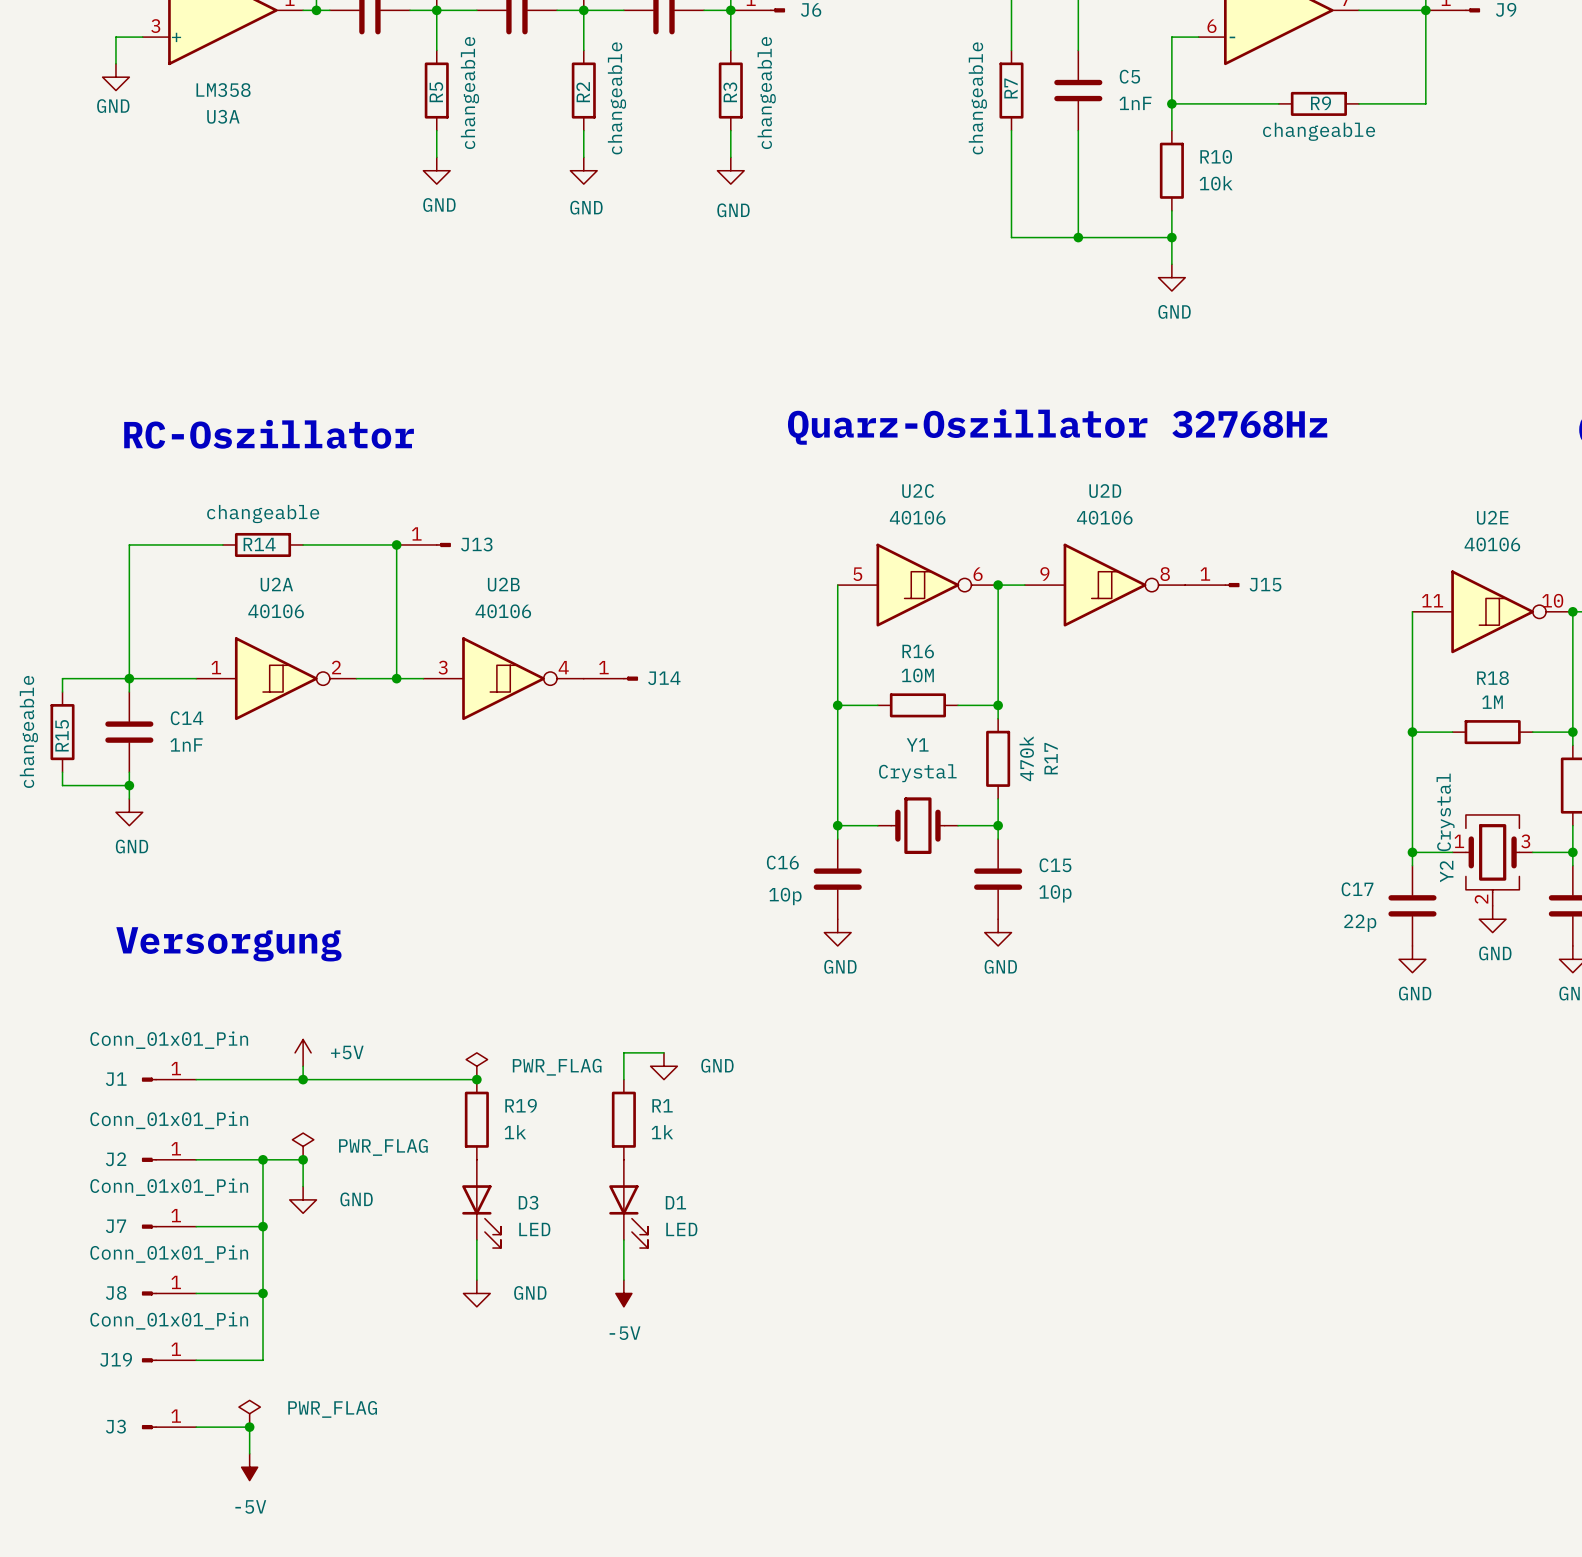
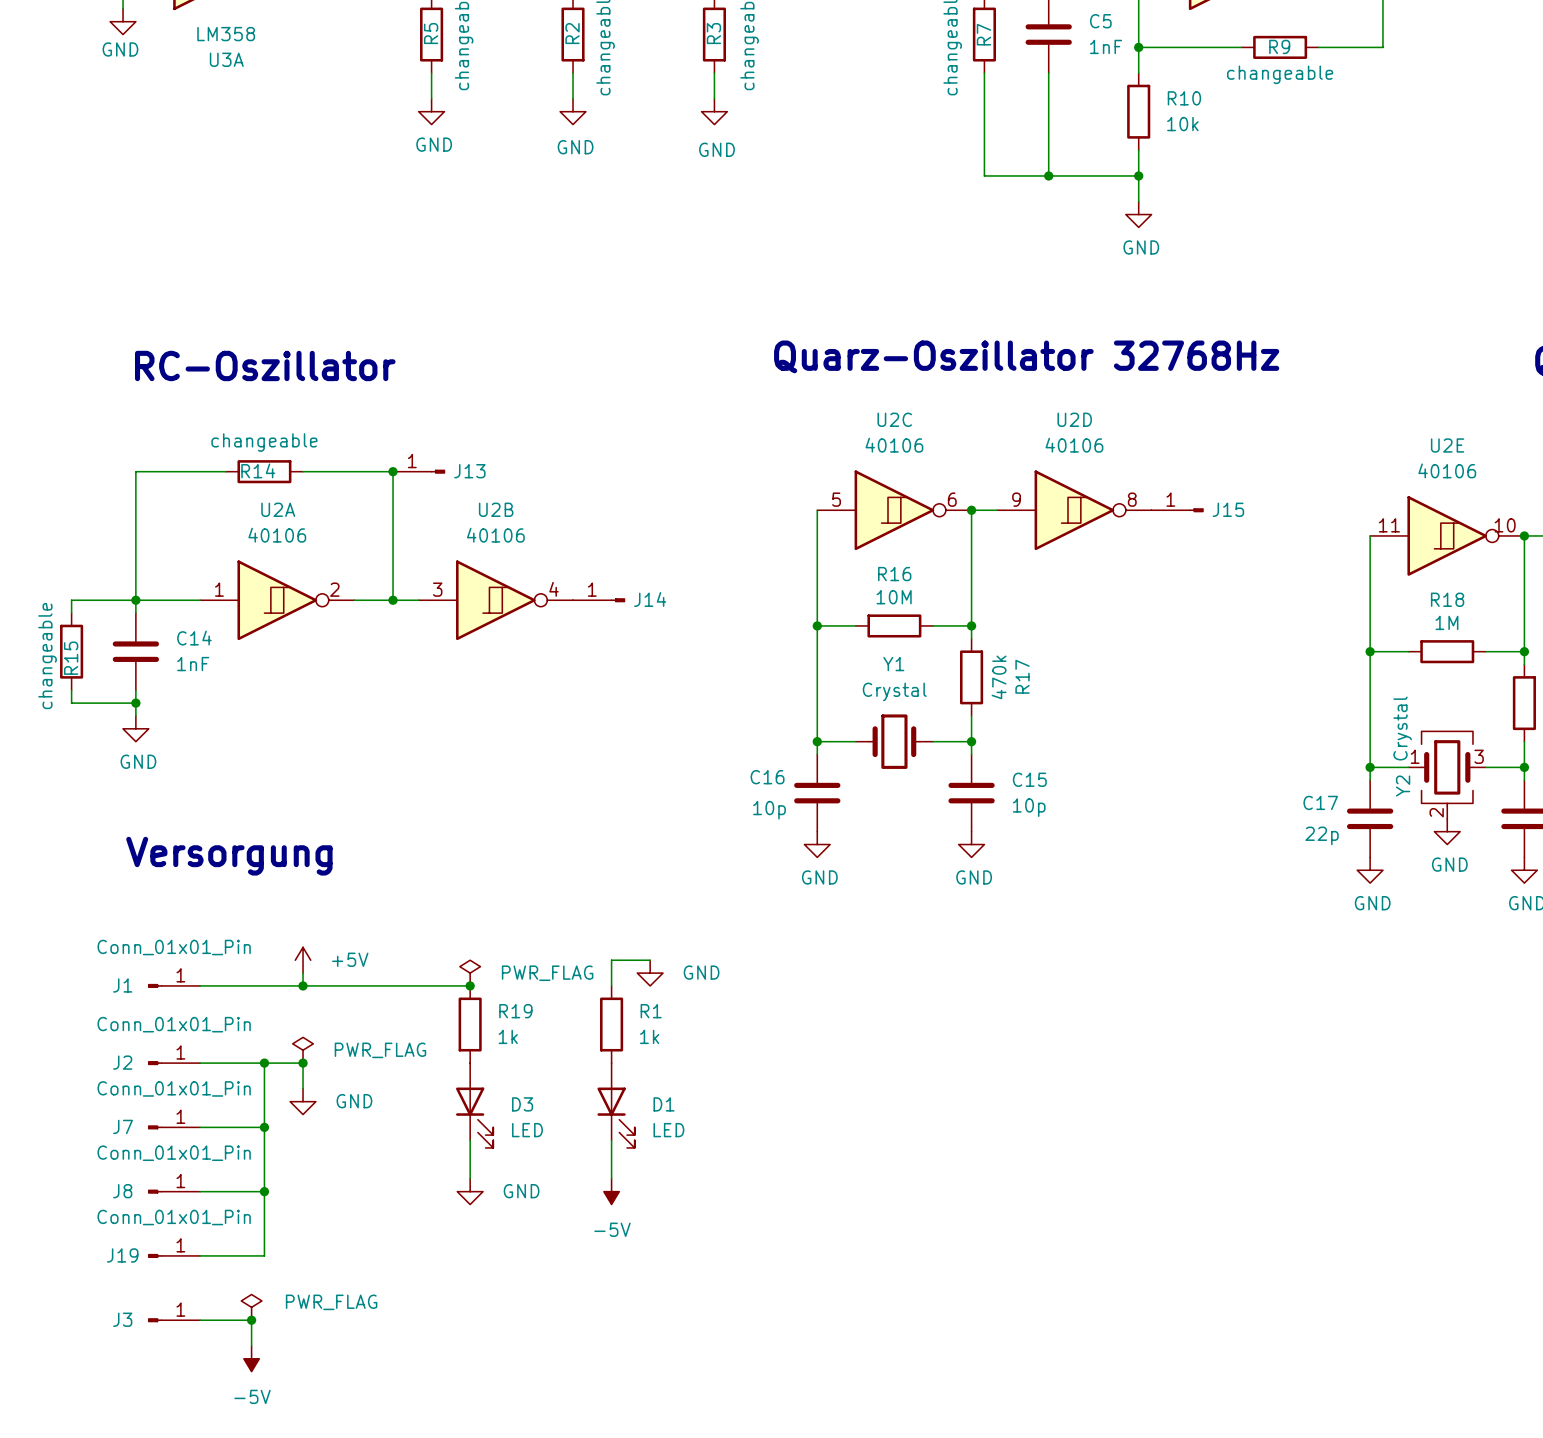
R15 text: changeable (28, 731) -> none
R15 value: none -> changeable (47, 656)

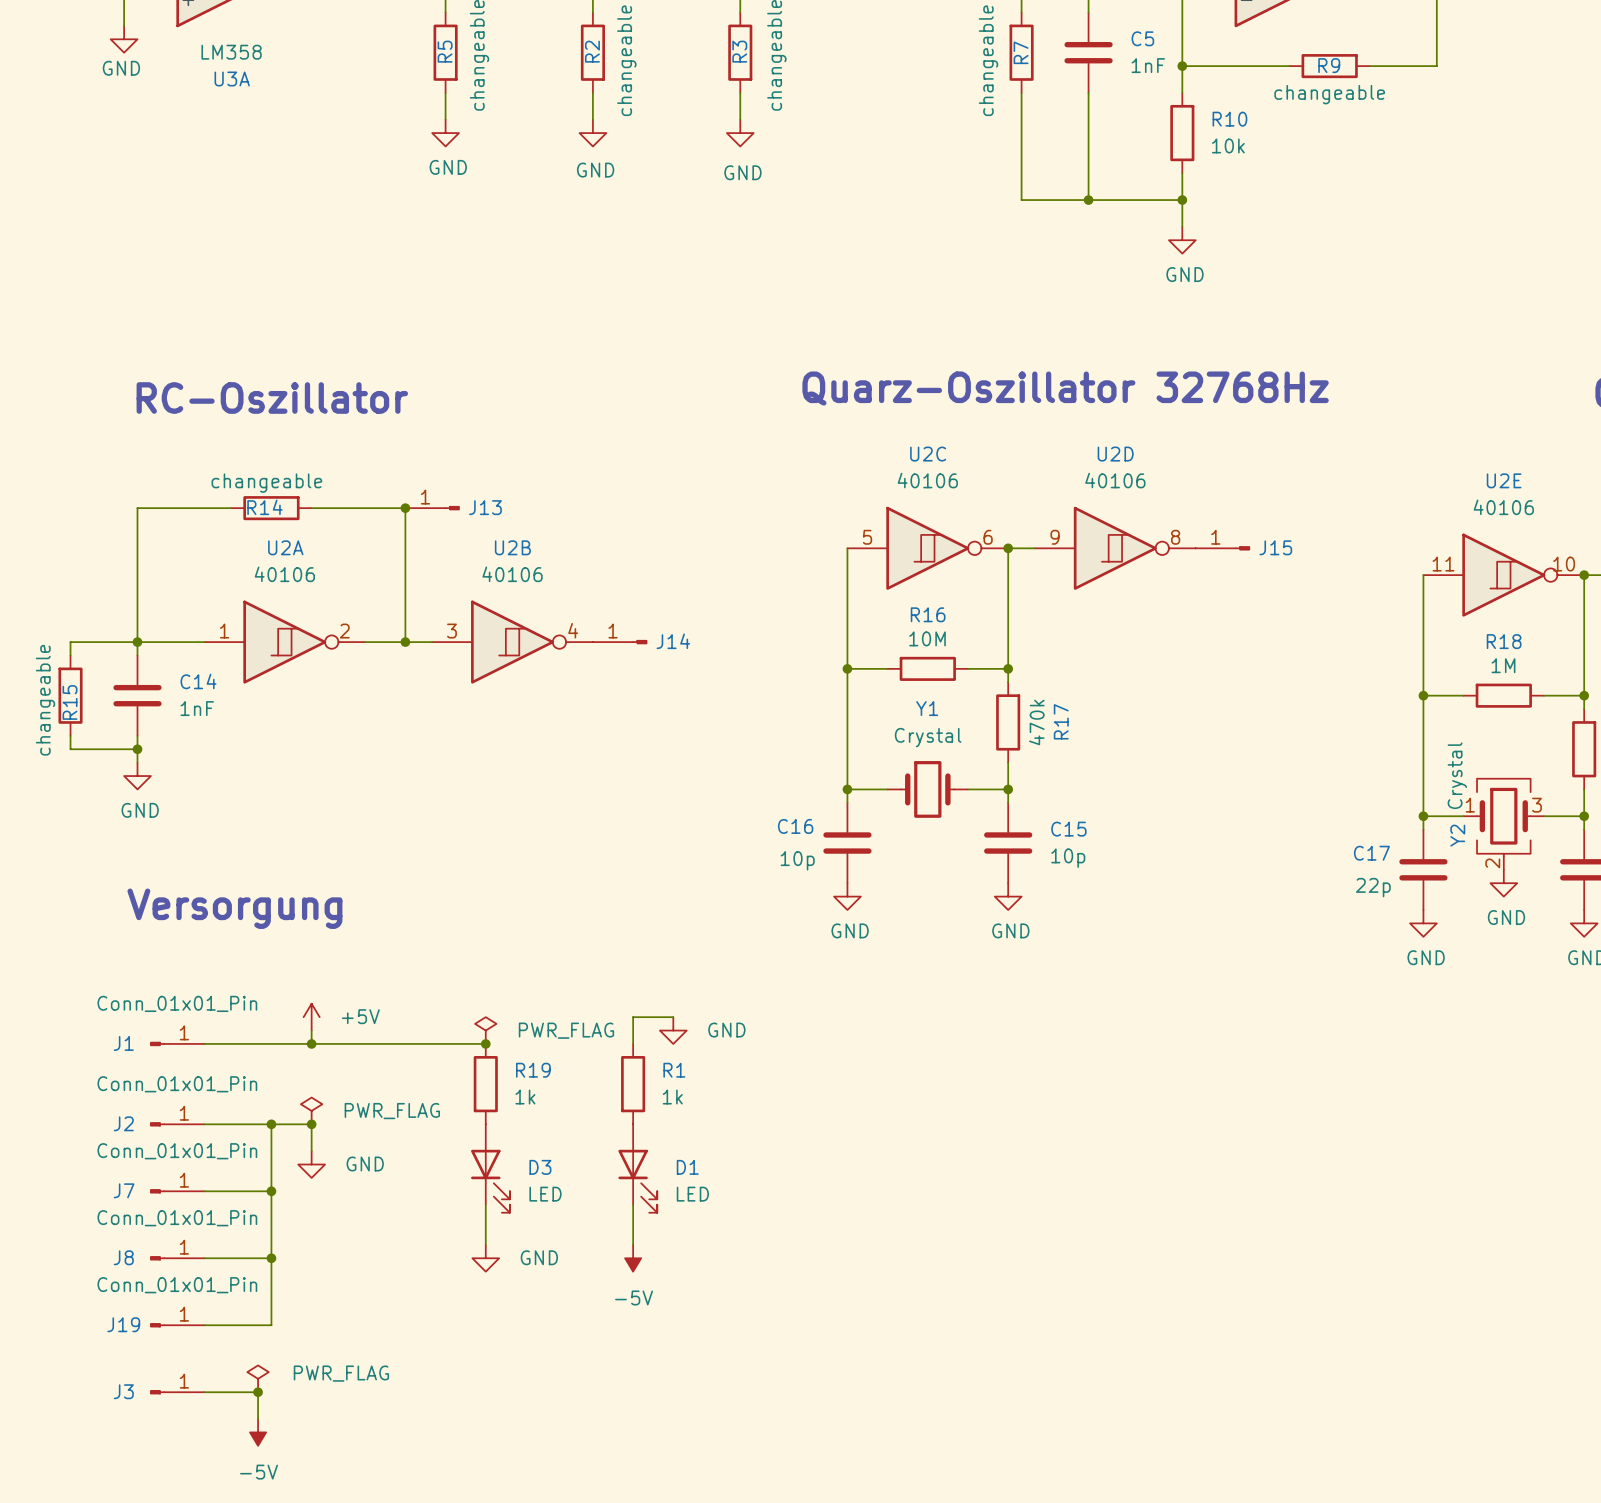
R14 text: changeable (264, 442) -> none
R14 value: none -> changeable (266, 483)

